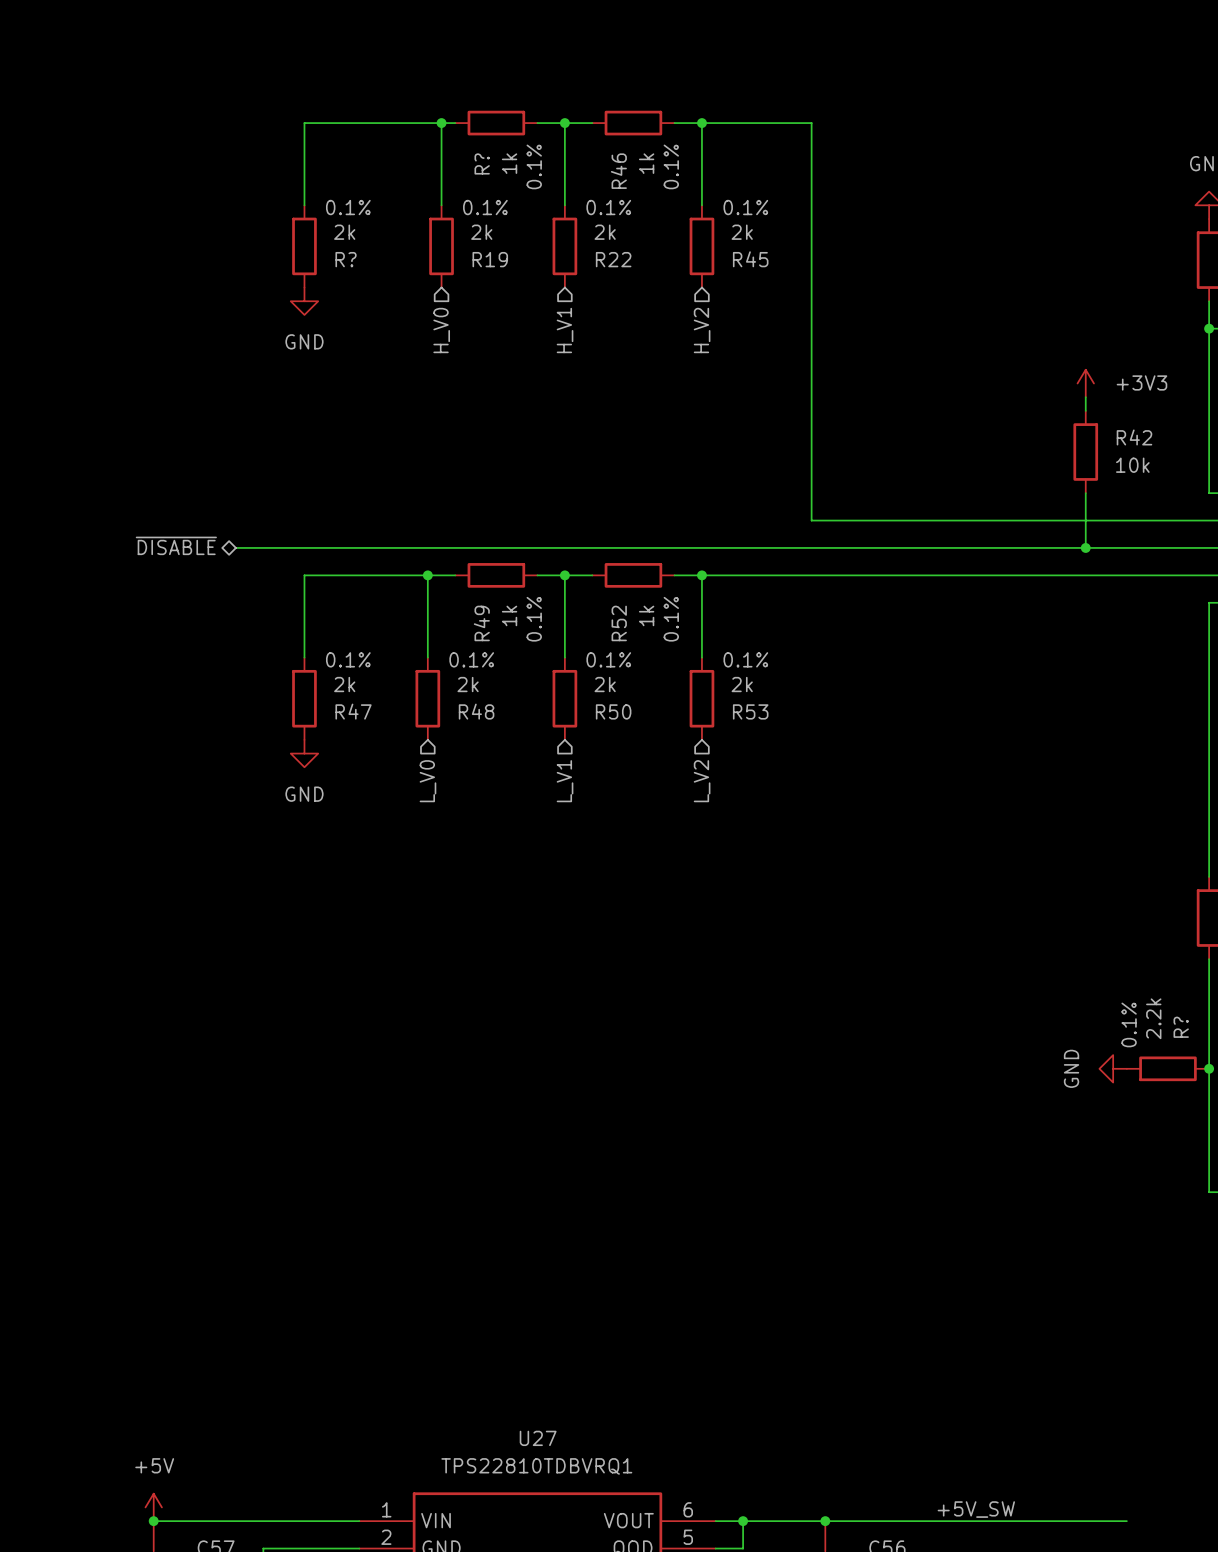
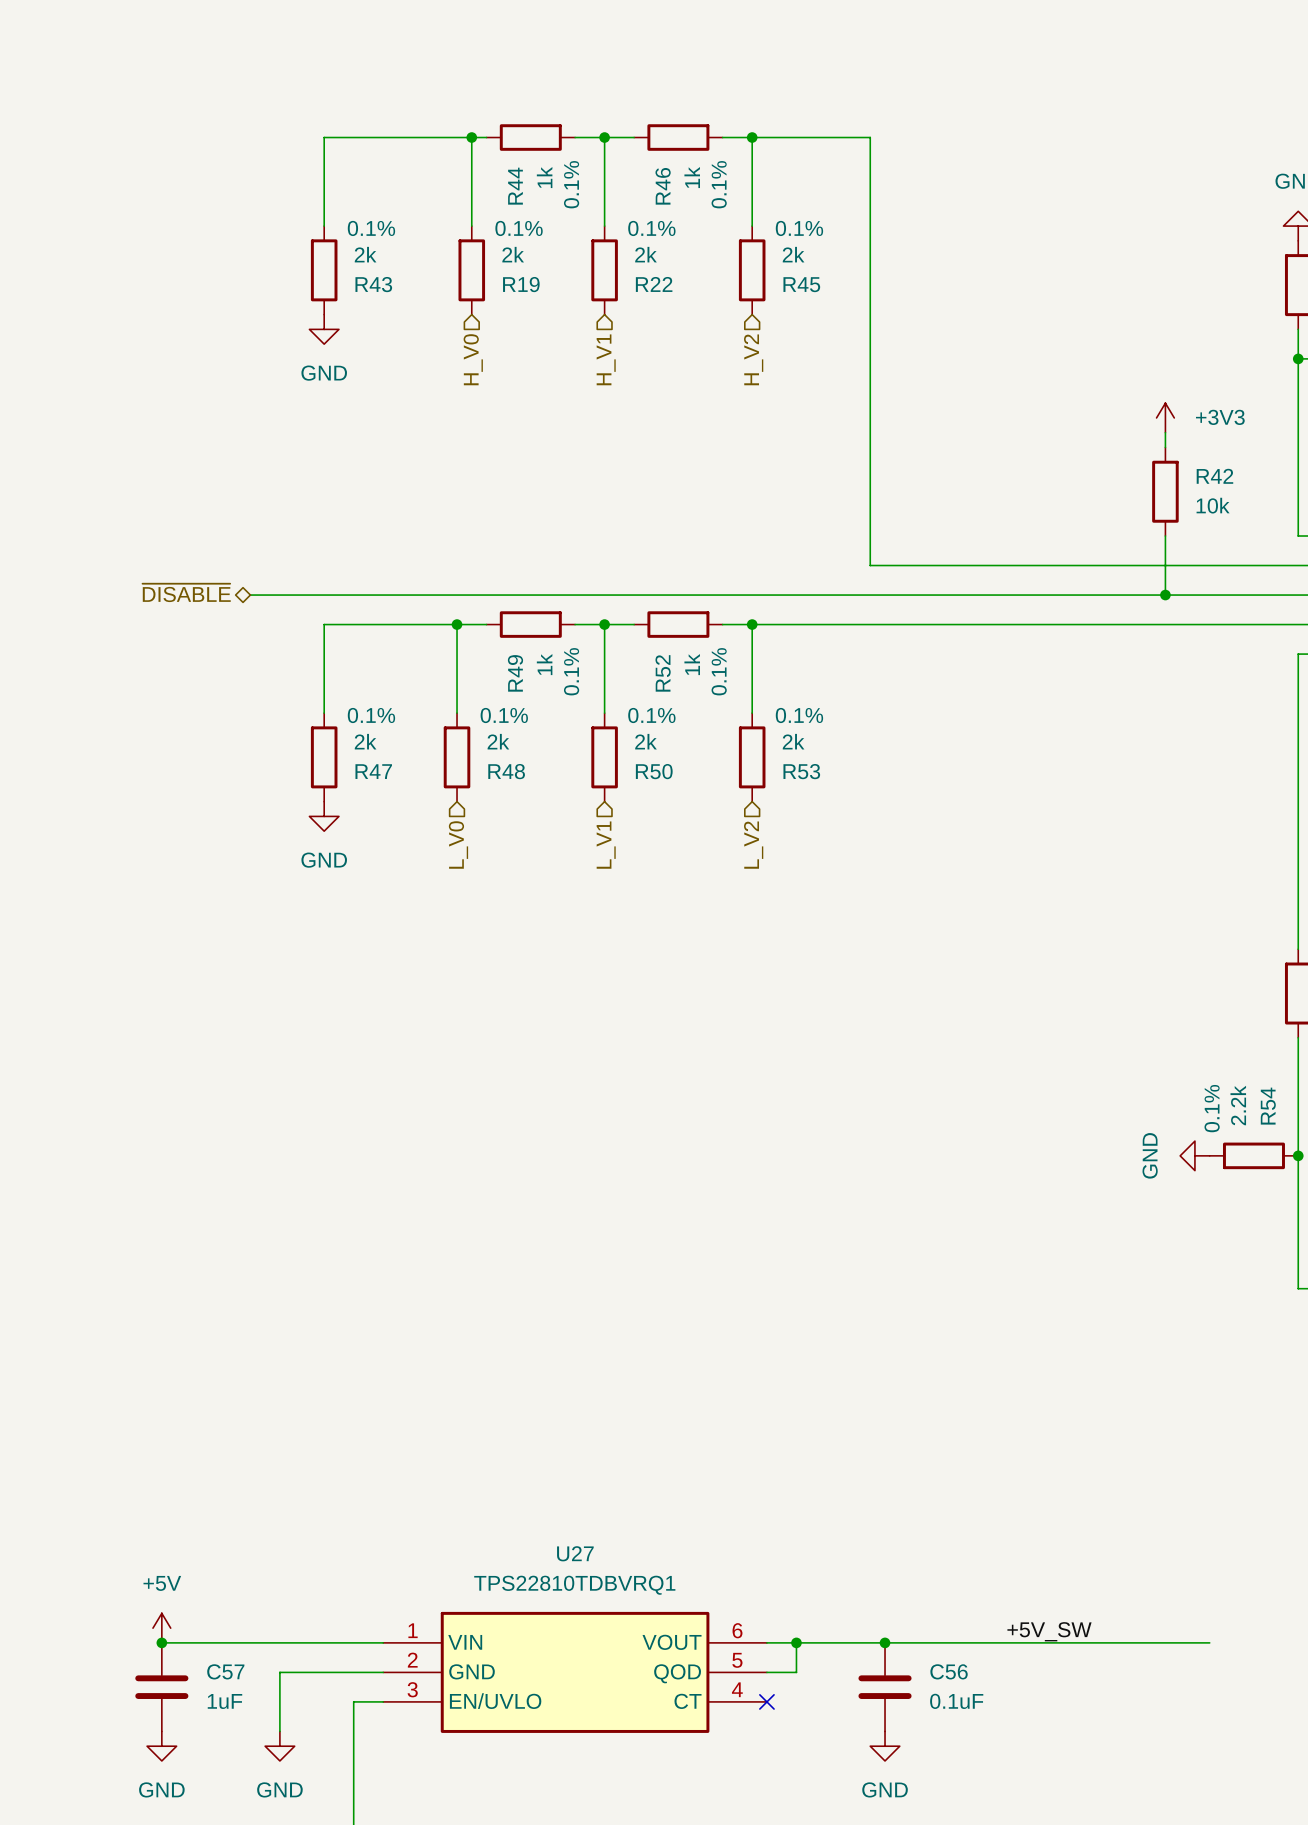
R? name: R? (482, 163) -> R44 (515, 186)
R? name: R? (346, 259) -> R43 (373, 284)
R? name: R? (1181, 1027) -> R54 (1268, 1106)

